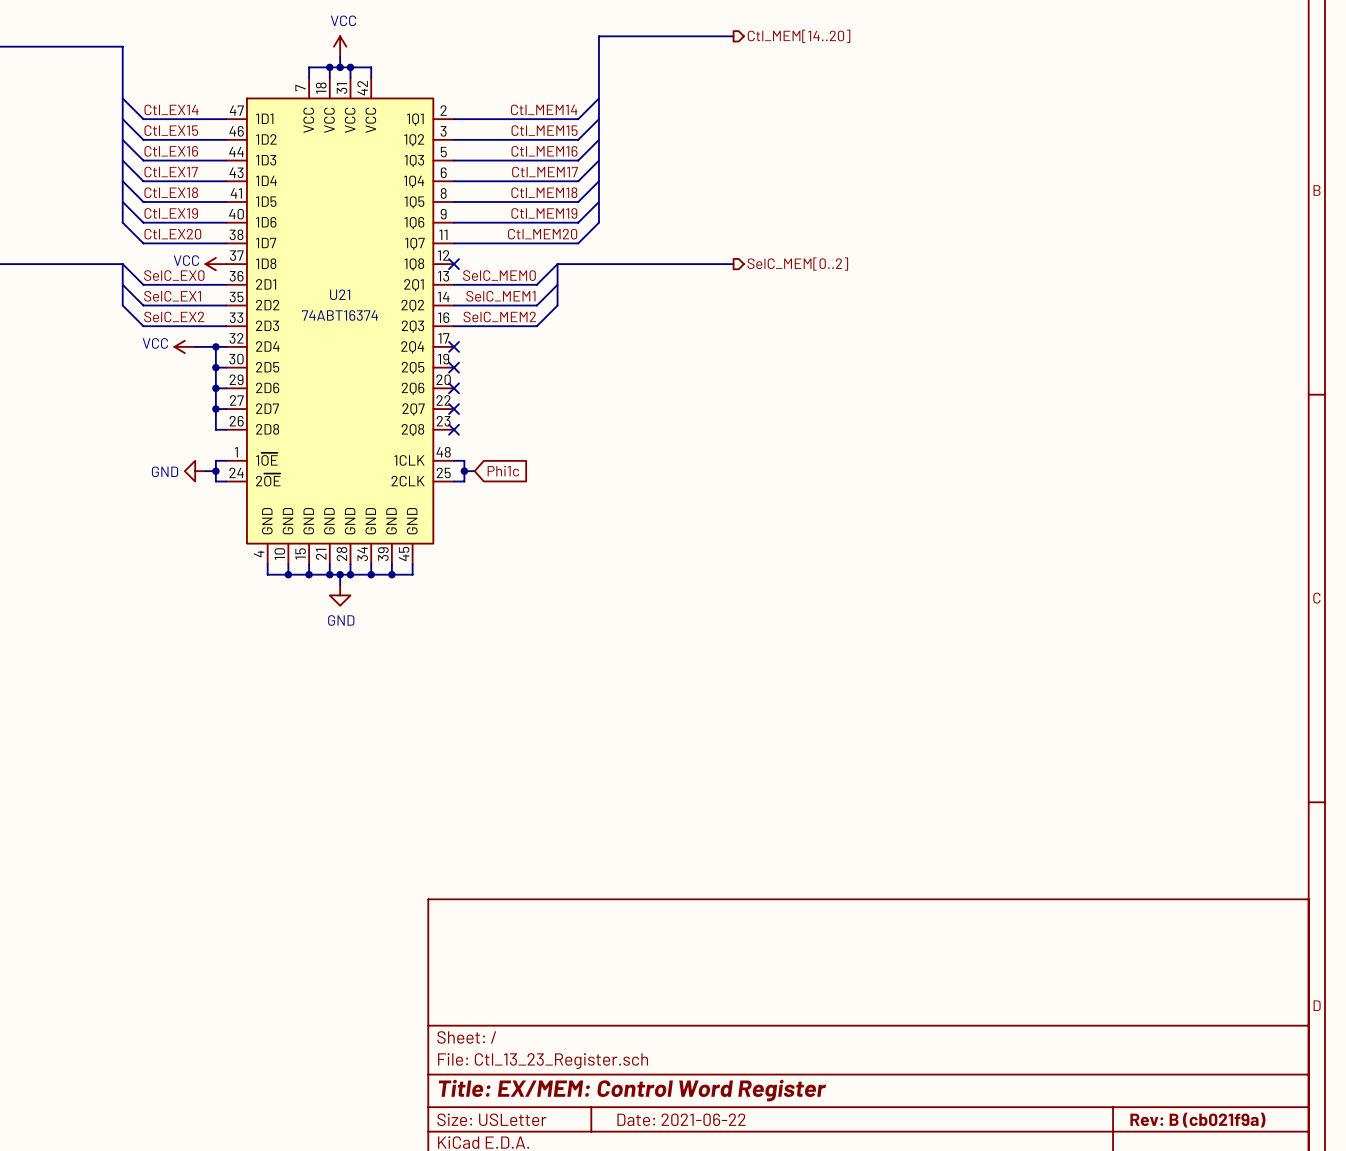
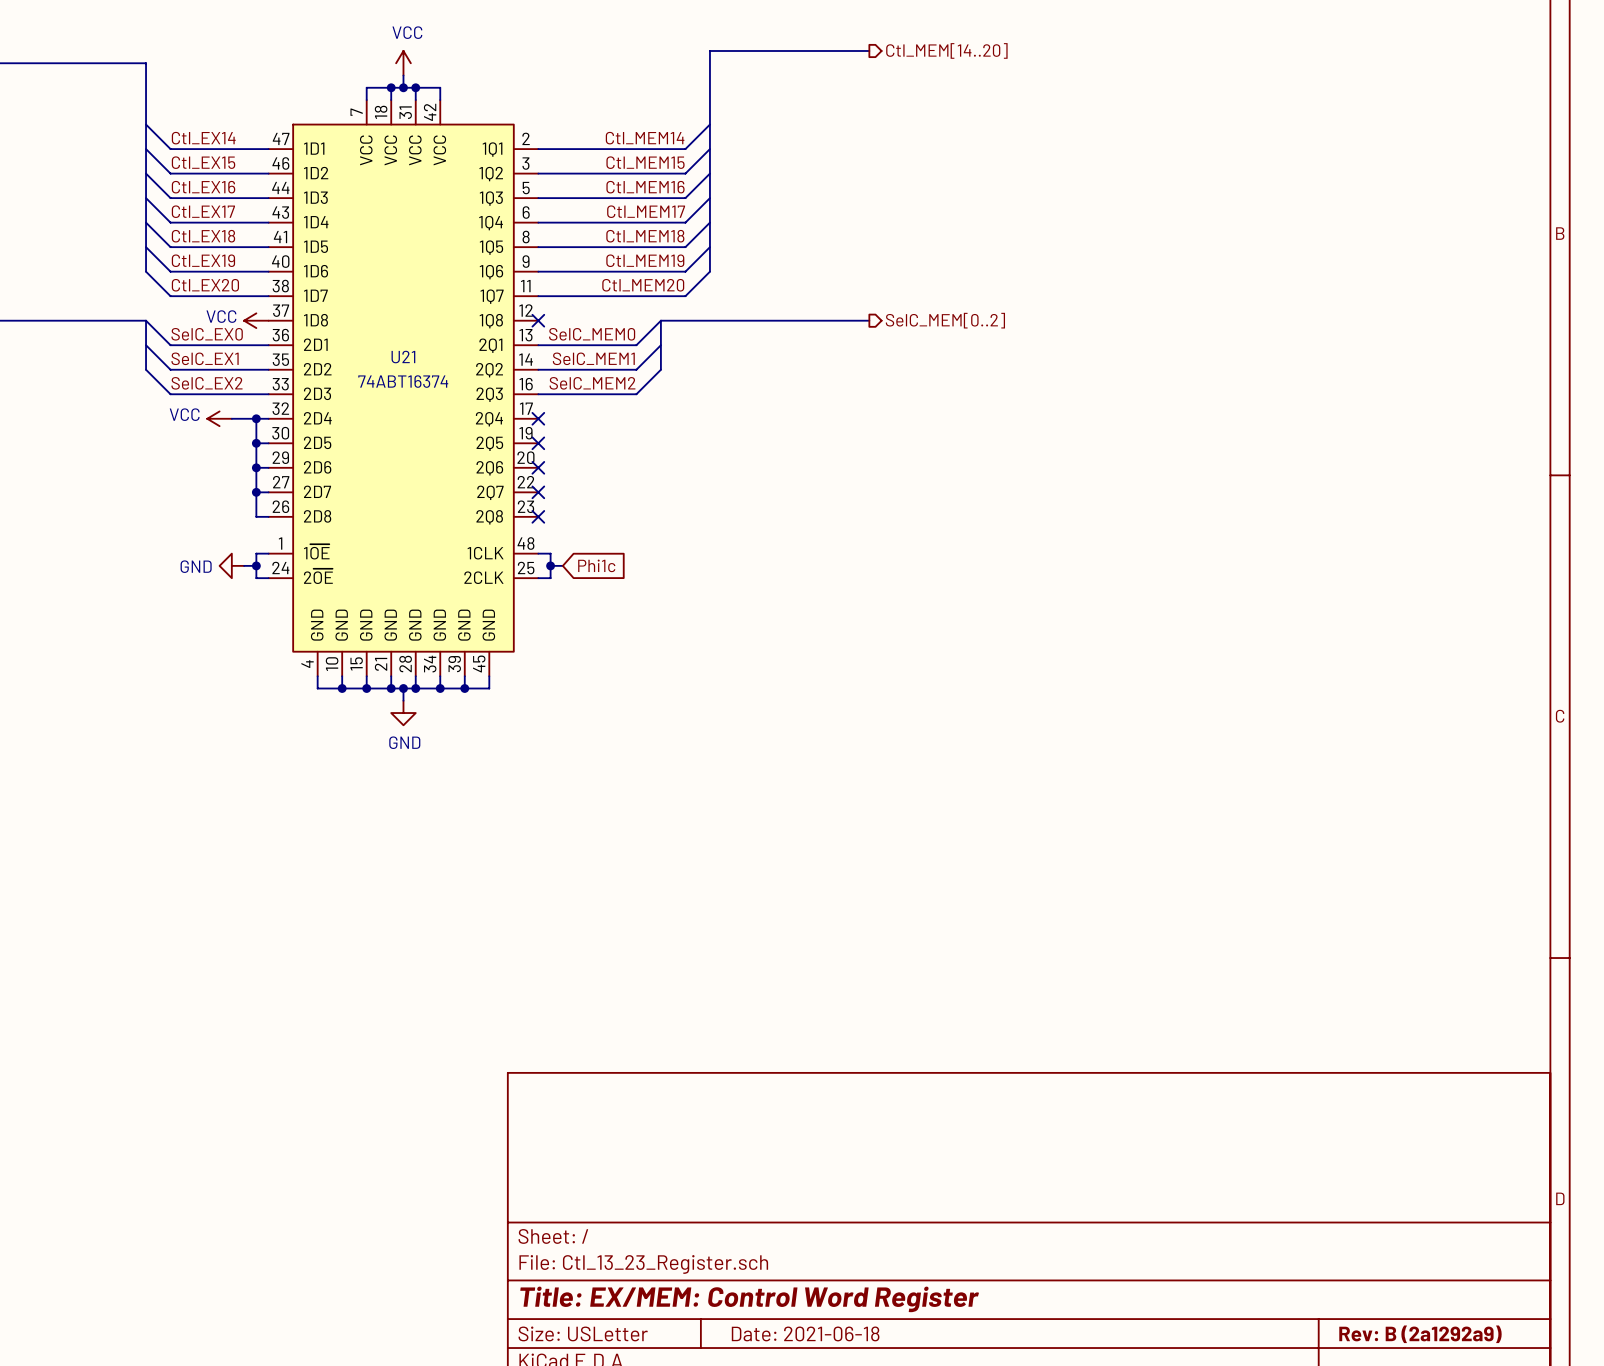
title block: Date: 2021-06-22 (681, 1119) -> Date: 2021-06-18 (805, 1333)
title block: Rev: B (cb021f9a) (1197, 1120) -> Rev: B (2a1292a9) (1420, 1334)

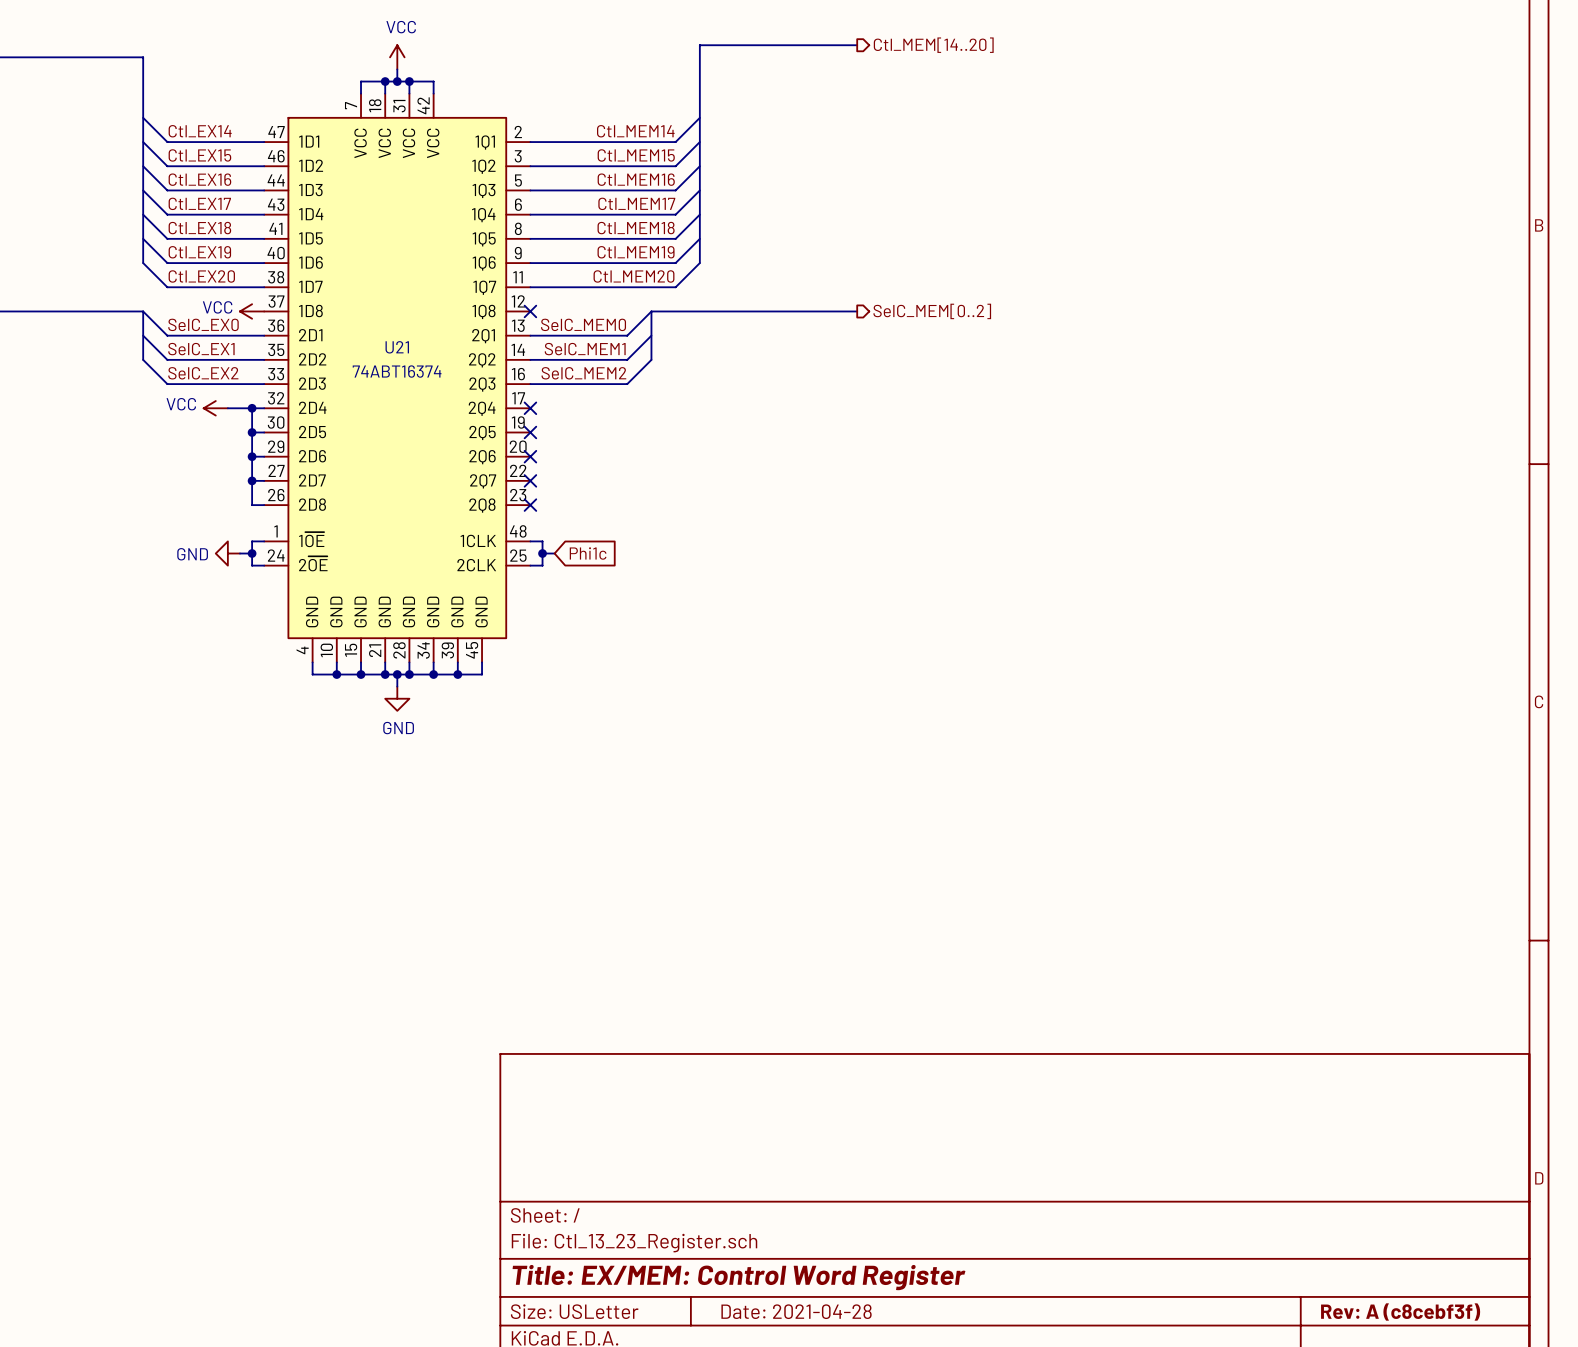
title block: Date: 2021-06-18 (805, 1333) -> Date: 2021-04-28 (796, 1311)
title block: Rev: B (2a1292a9) (1420, 1334) -> Rev: A (c8cebf3f) (1400, 1312)

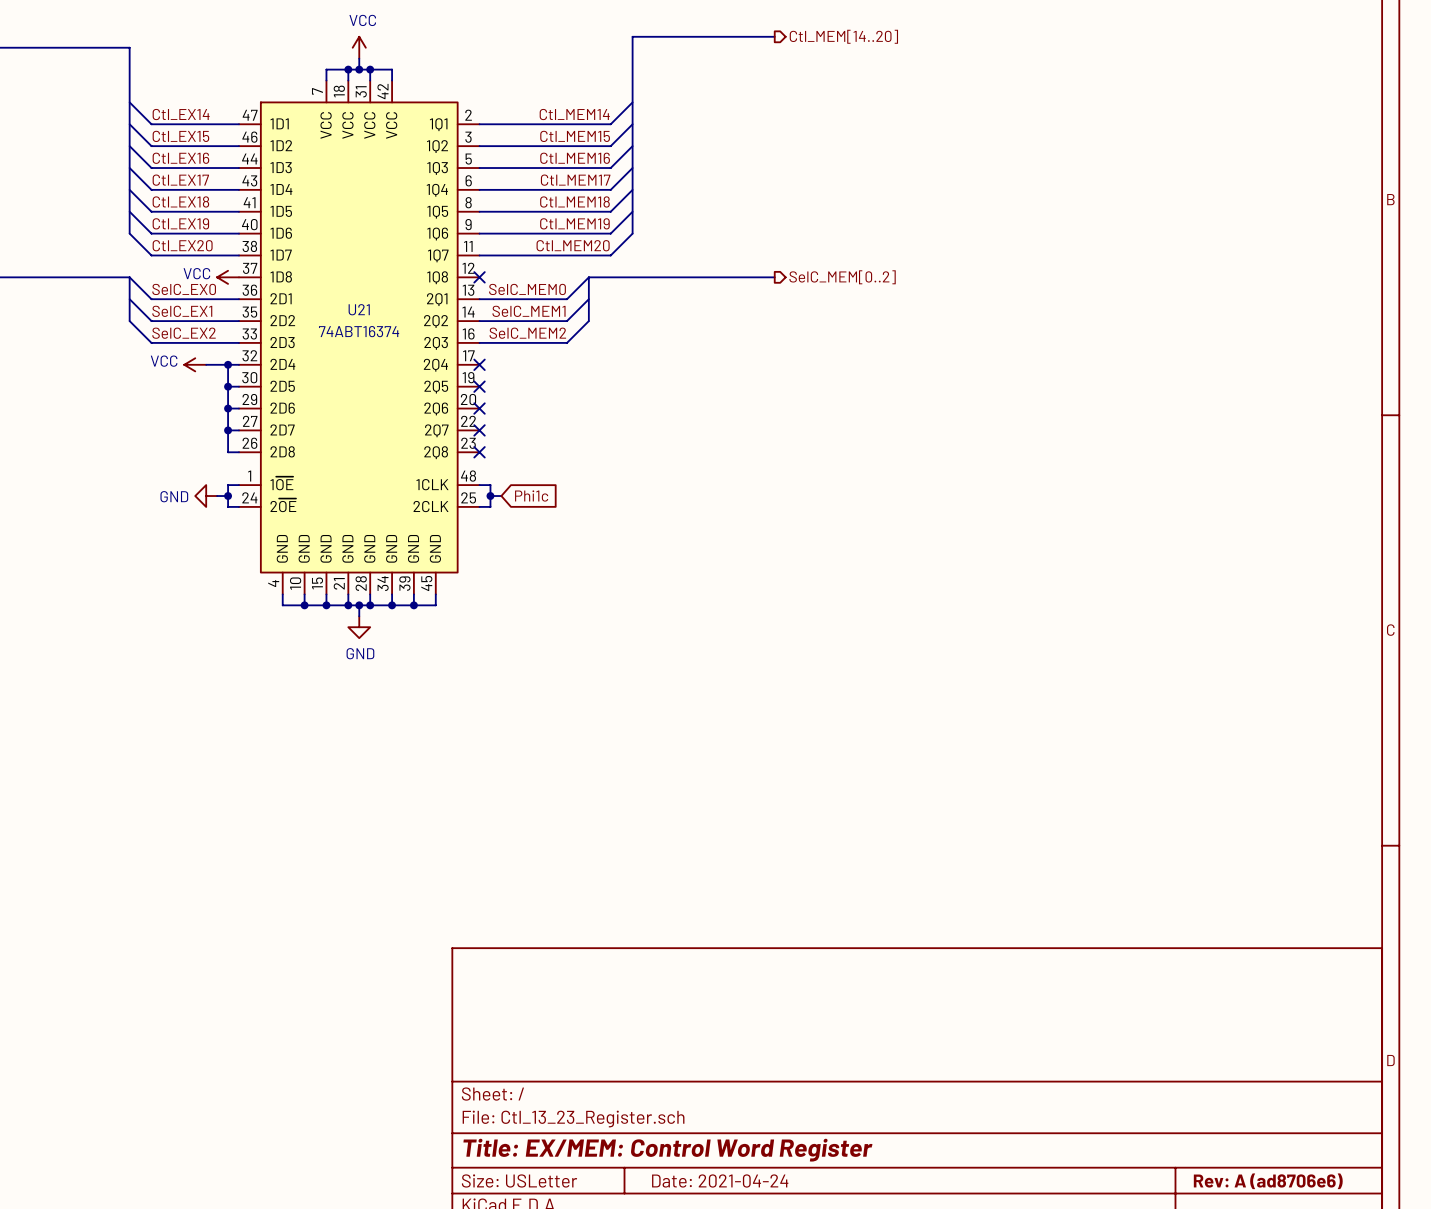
title block: Date: 2021-04-28 (796, 1311) -> Date: 2021-04-24 (720, 1180)
title block: Rev: A (c8cebf3f) (1400, 1312) -> Rev: A (ad8706e6) (1268, 1181)

